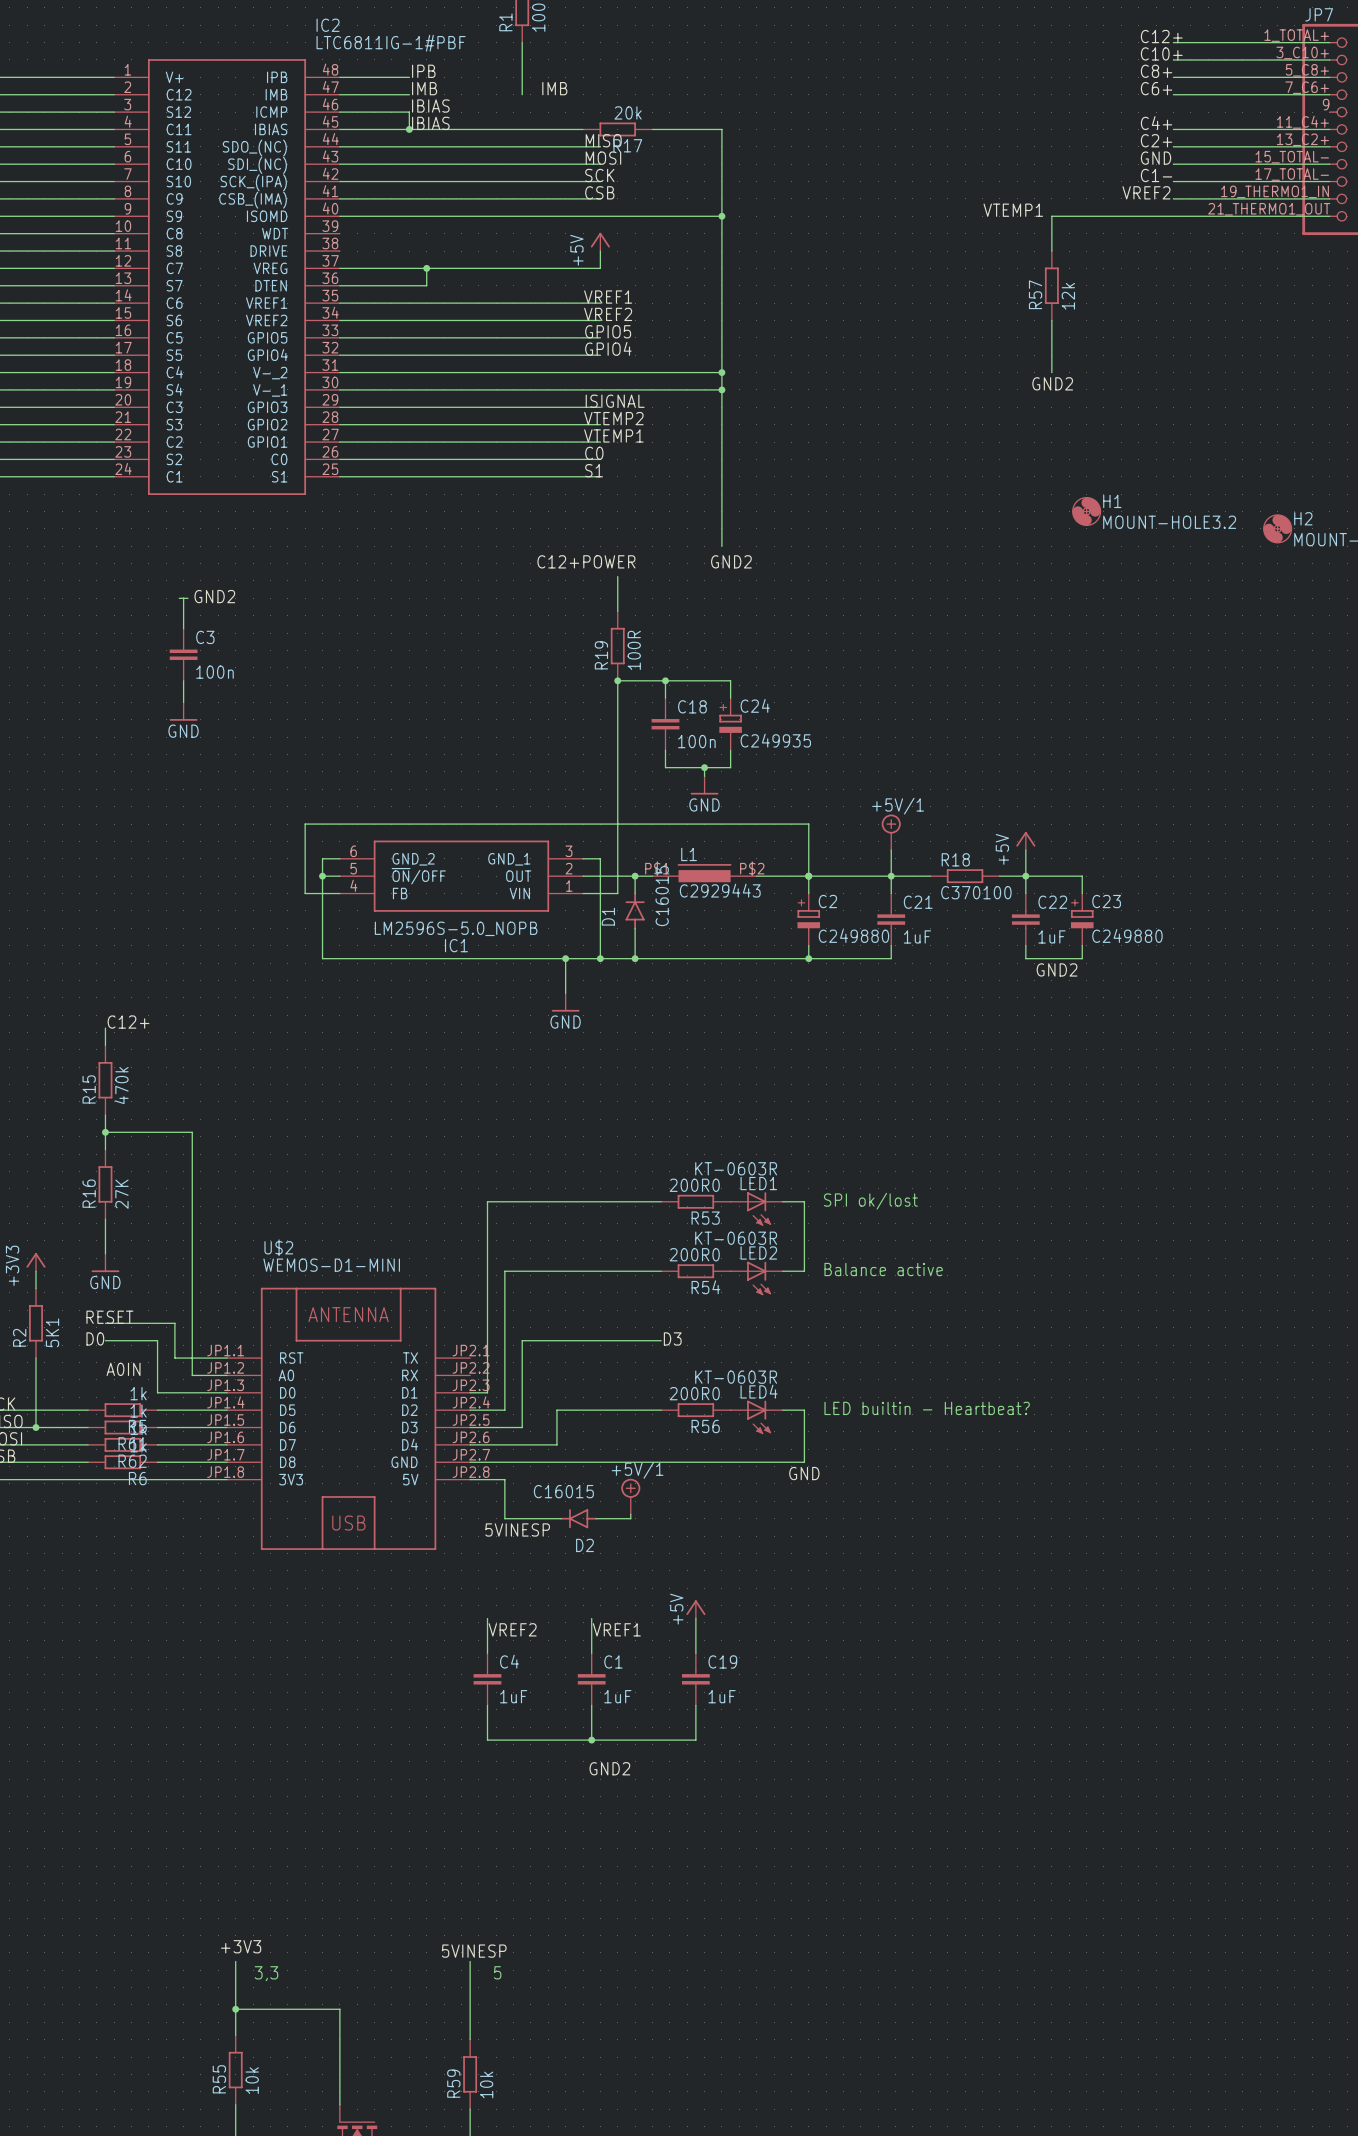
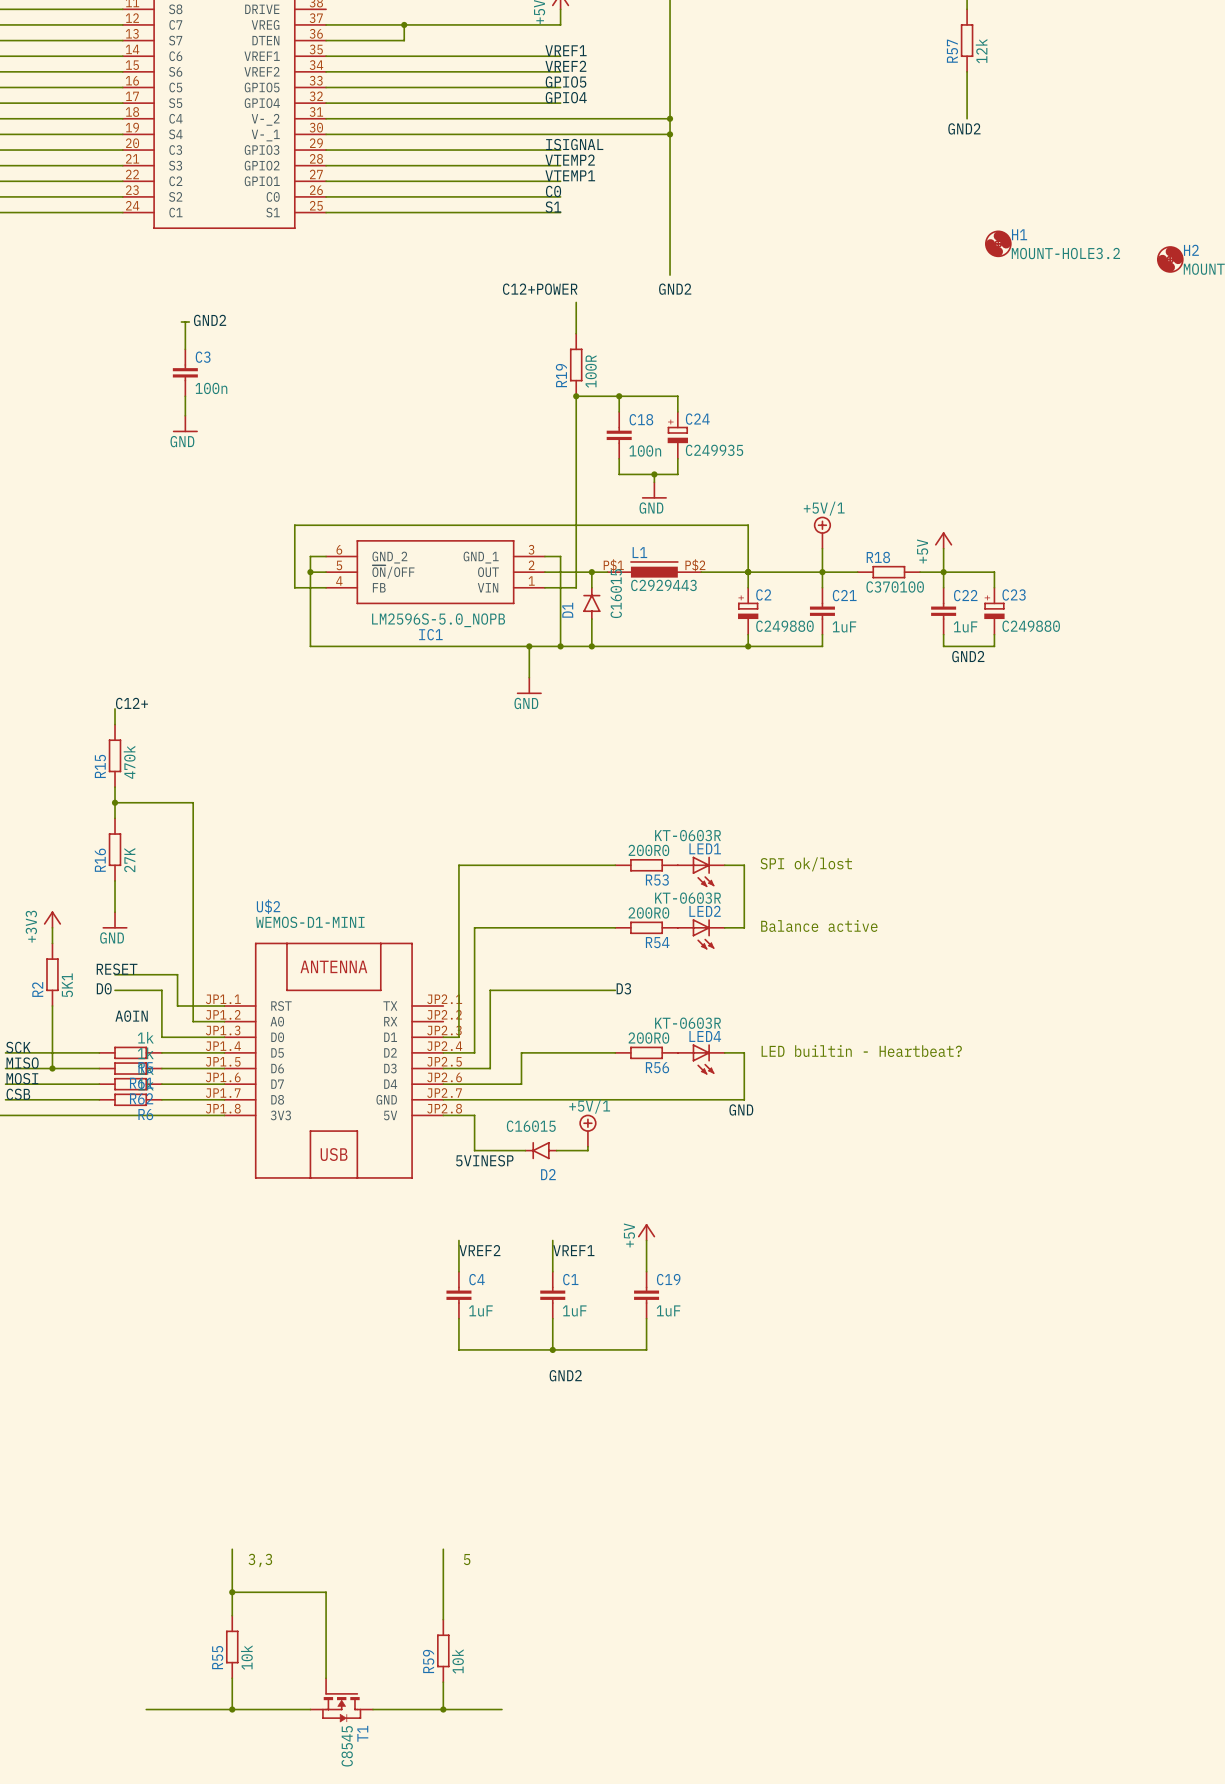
label: +3V3 (241, 1946) -> none
label: 5VINESP (474, 1951) -> none

